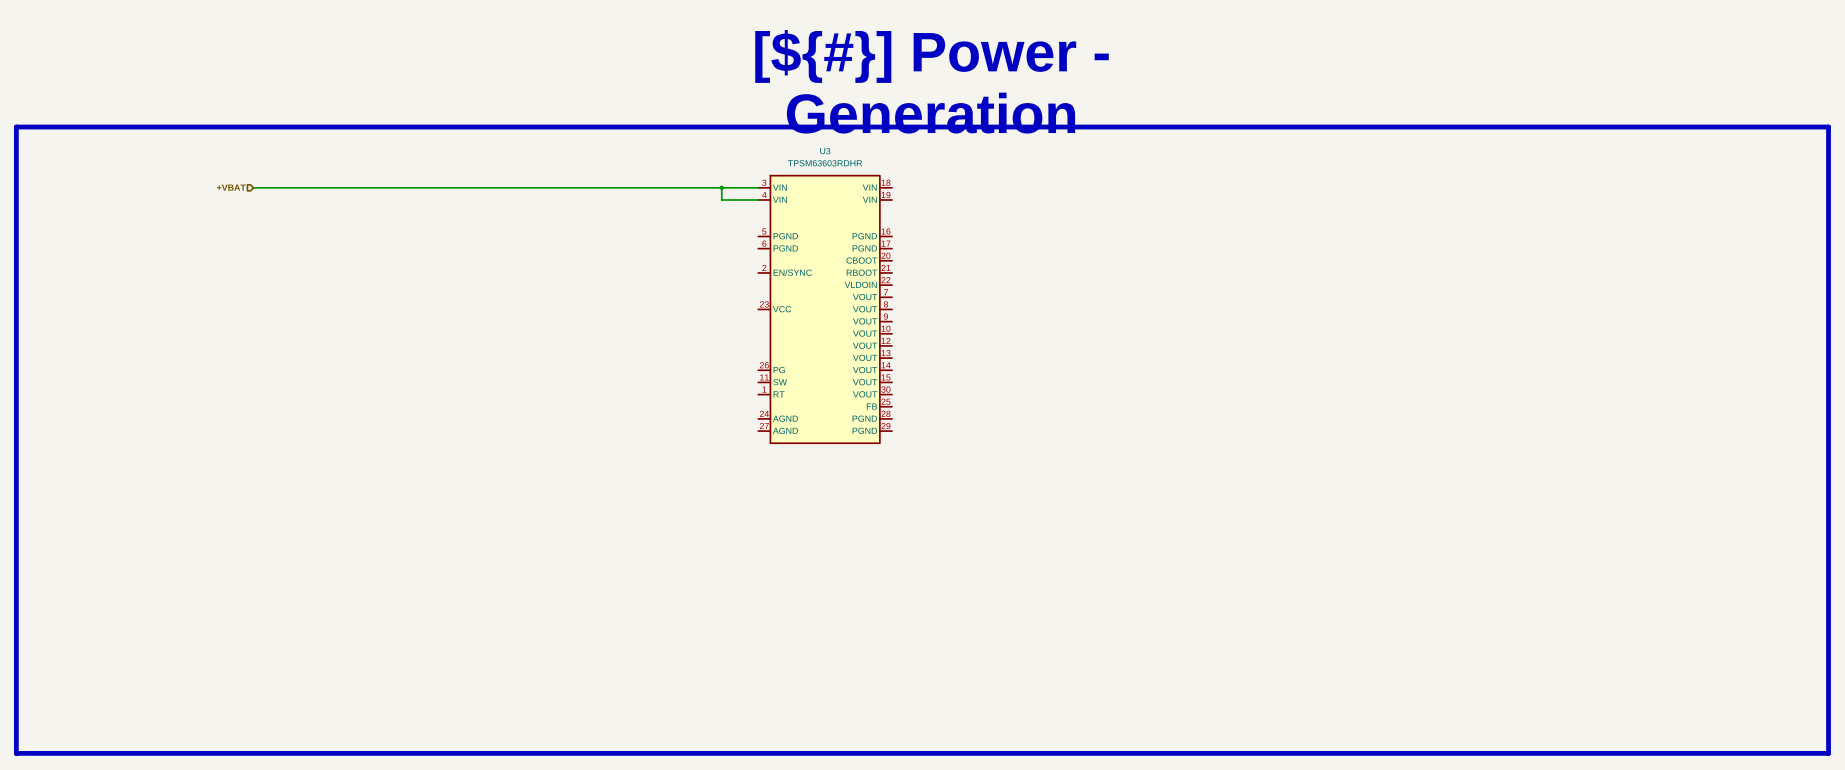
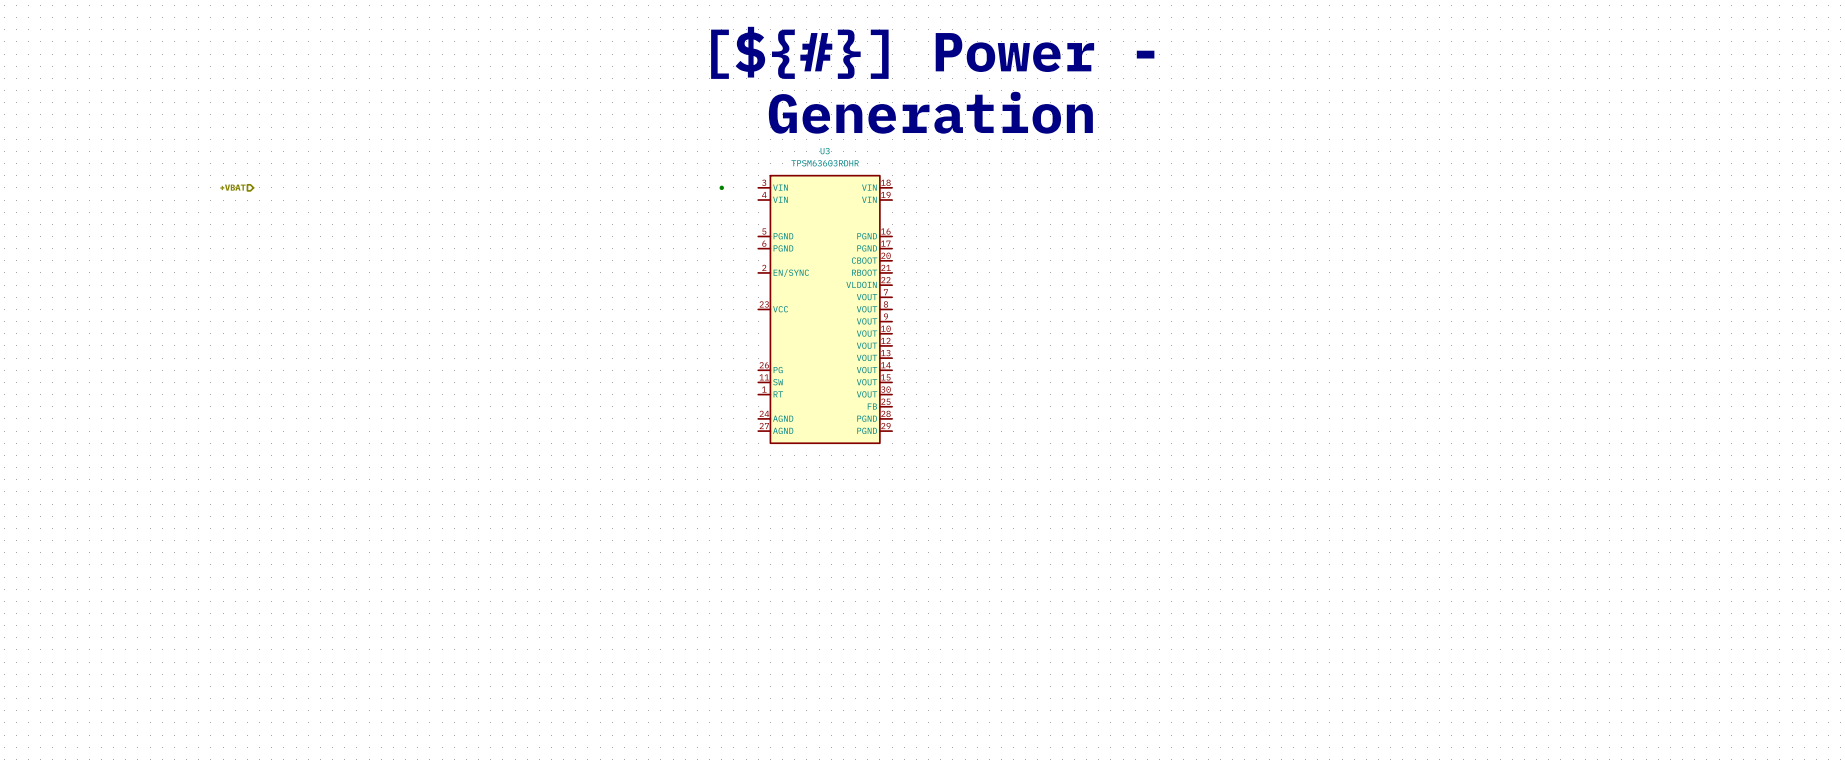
line: (16, 127) (1828, 127) (1828, 753) (16, 753) (16, 127) -> none
wire: (253, 187) (758, 187) -> none
wire: (721, 187) (721, 200) (758, 200) -> none

